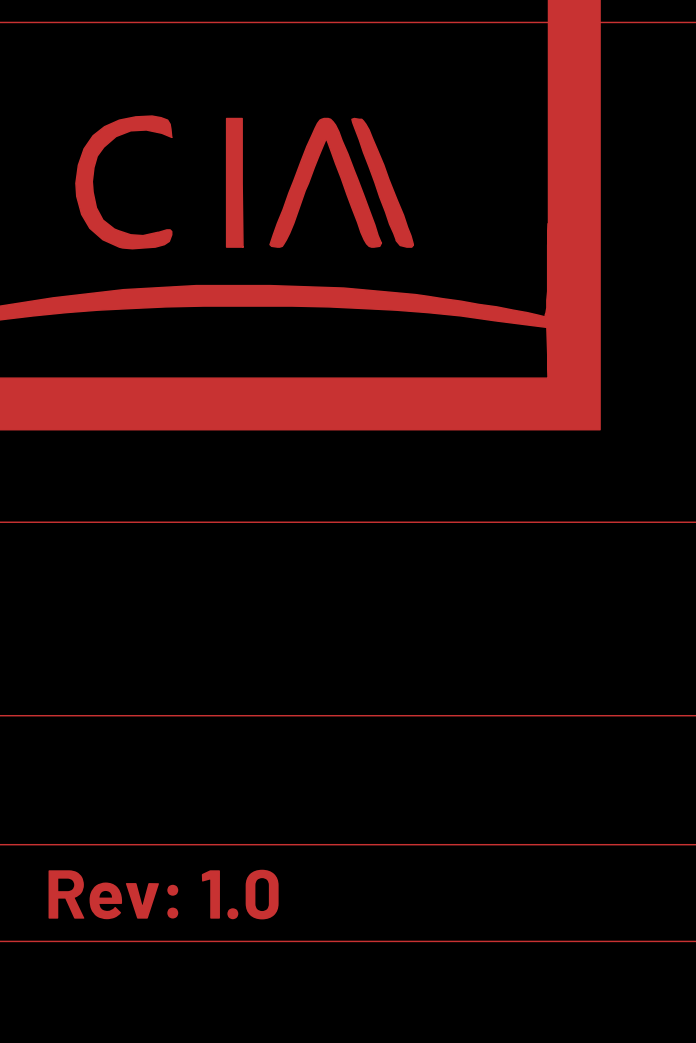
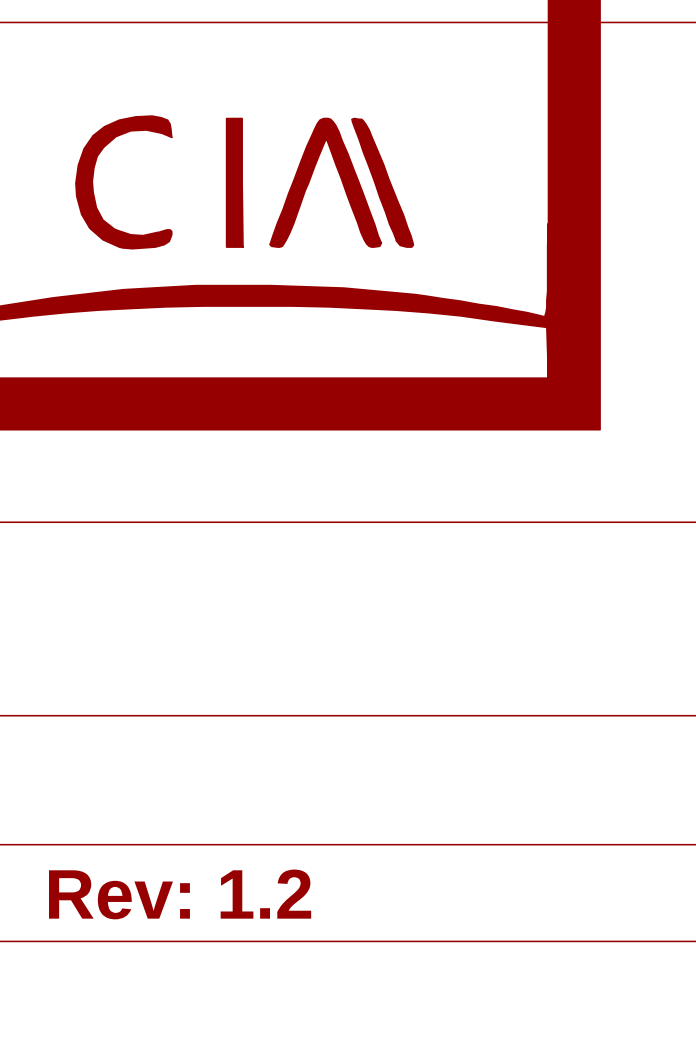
title block: Rev: 1.0 (163, 894) -> Rev: 1.2 (180, 894)

